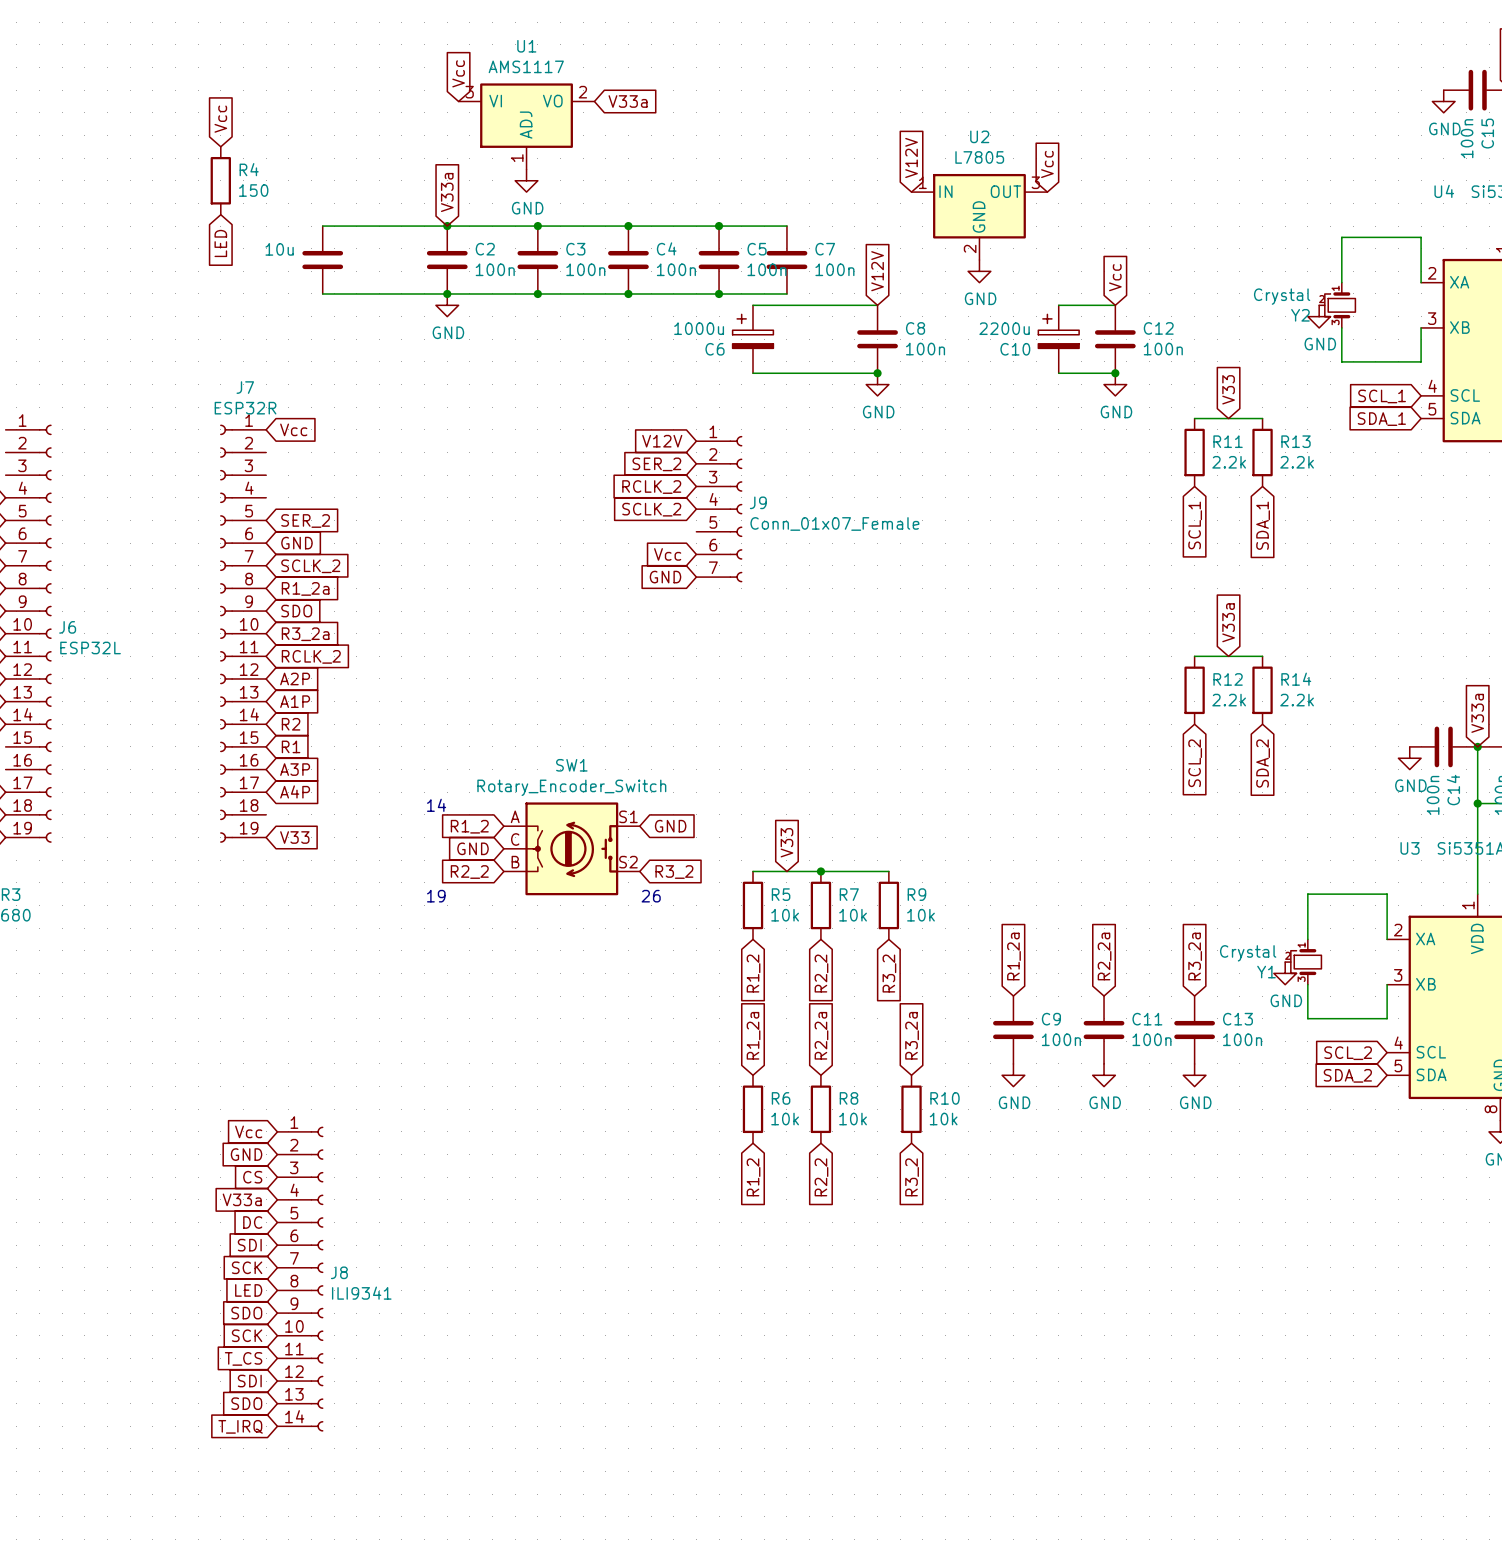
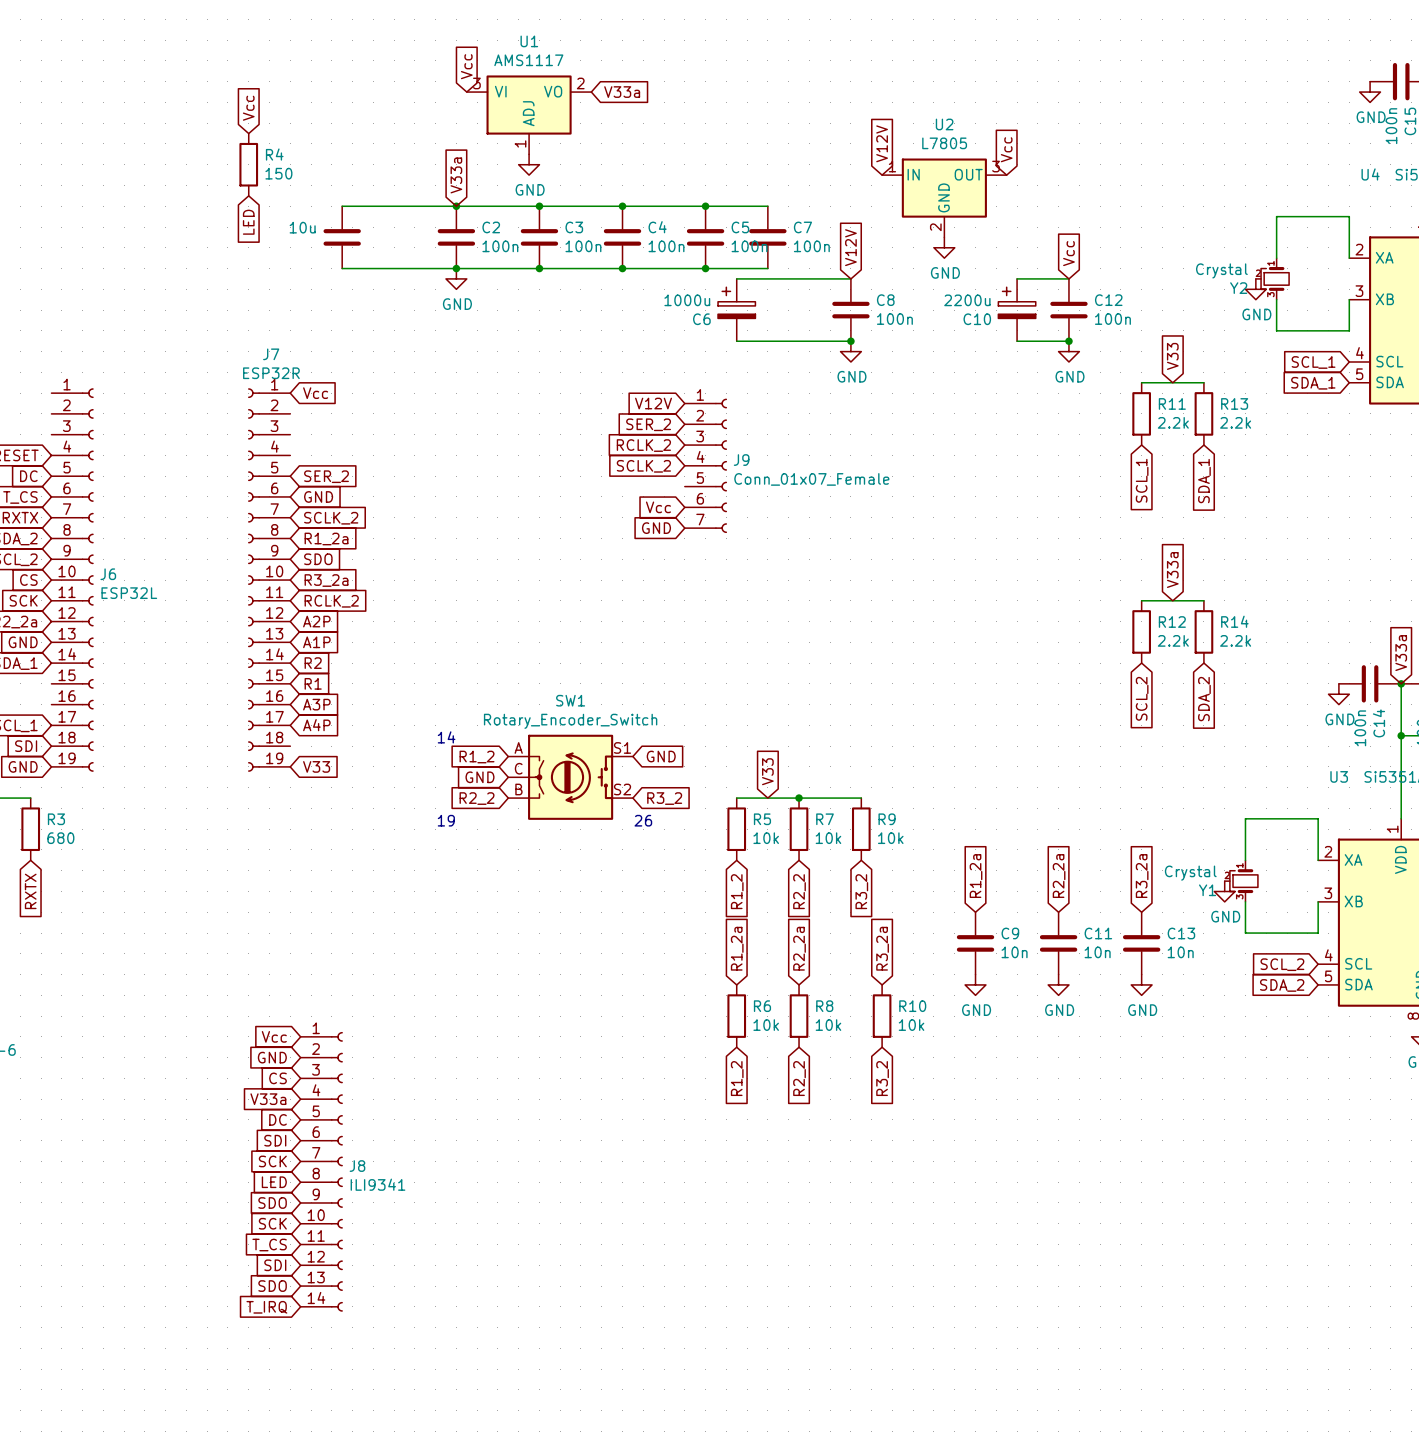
C9 value: 100n (1061, 1039) -> 10n (1014, 952)
C11 value: 100n (1151, 1039) -> 10n (1097, 952)
C13 value: 100n (1242, 1039) -> 10n (1180, 952)

